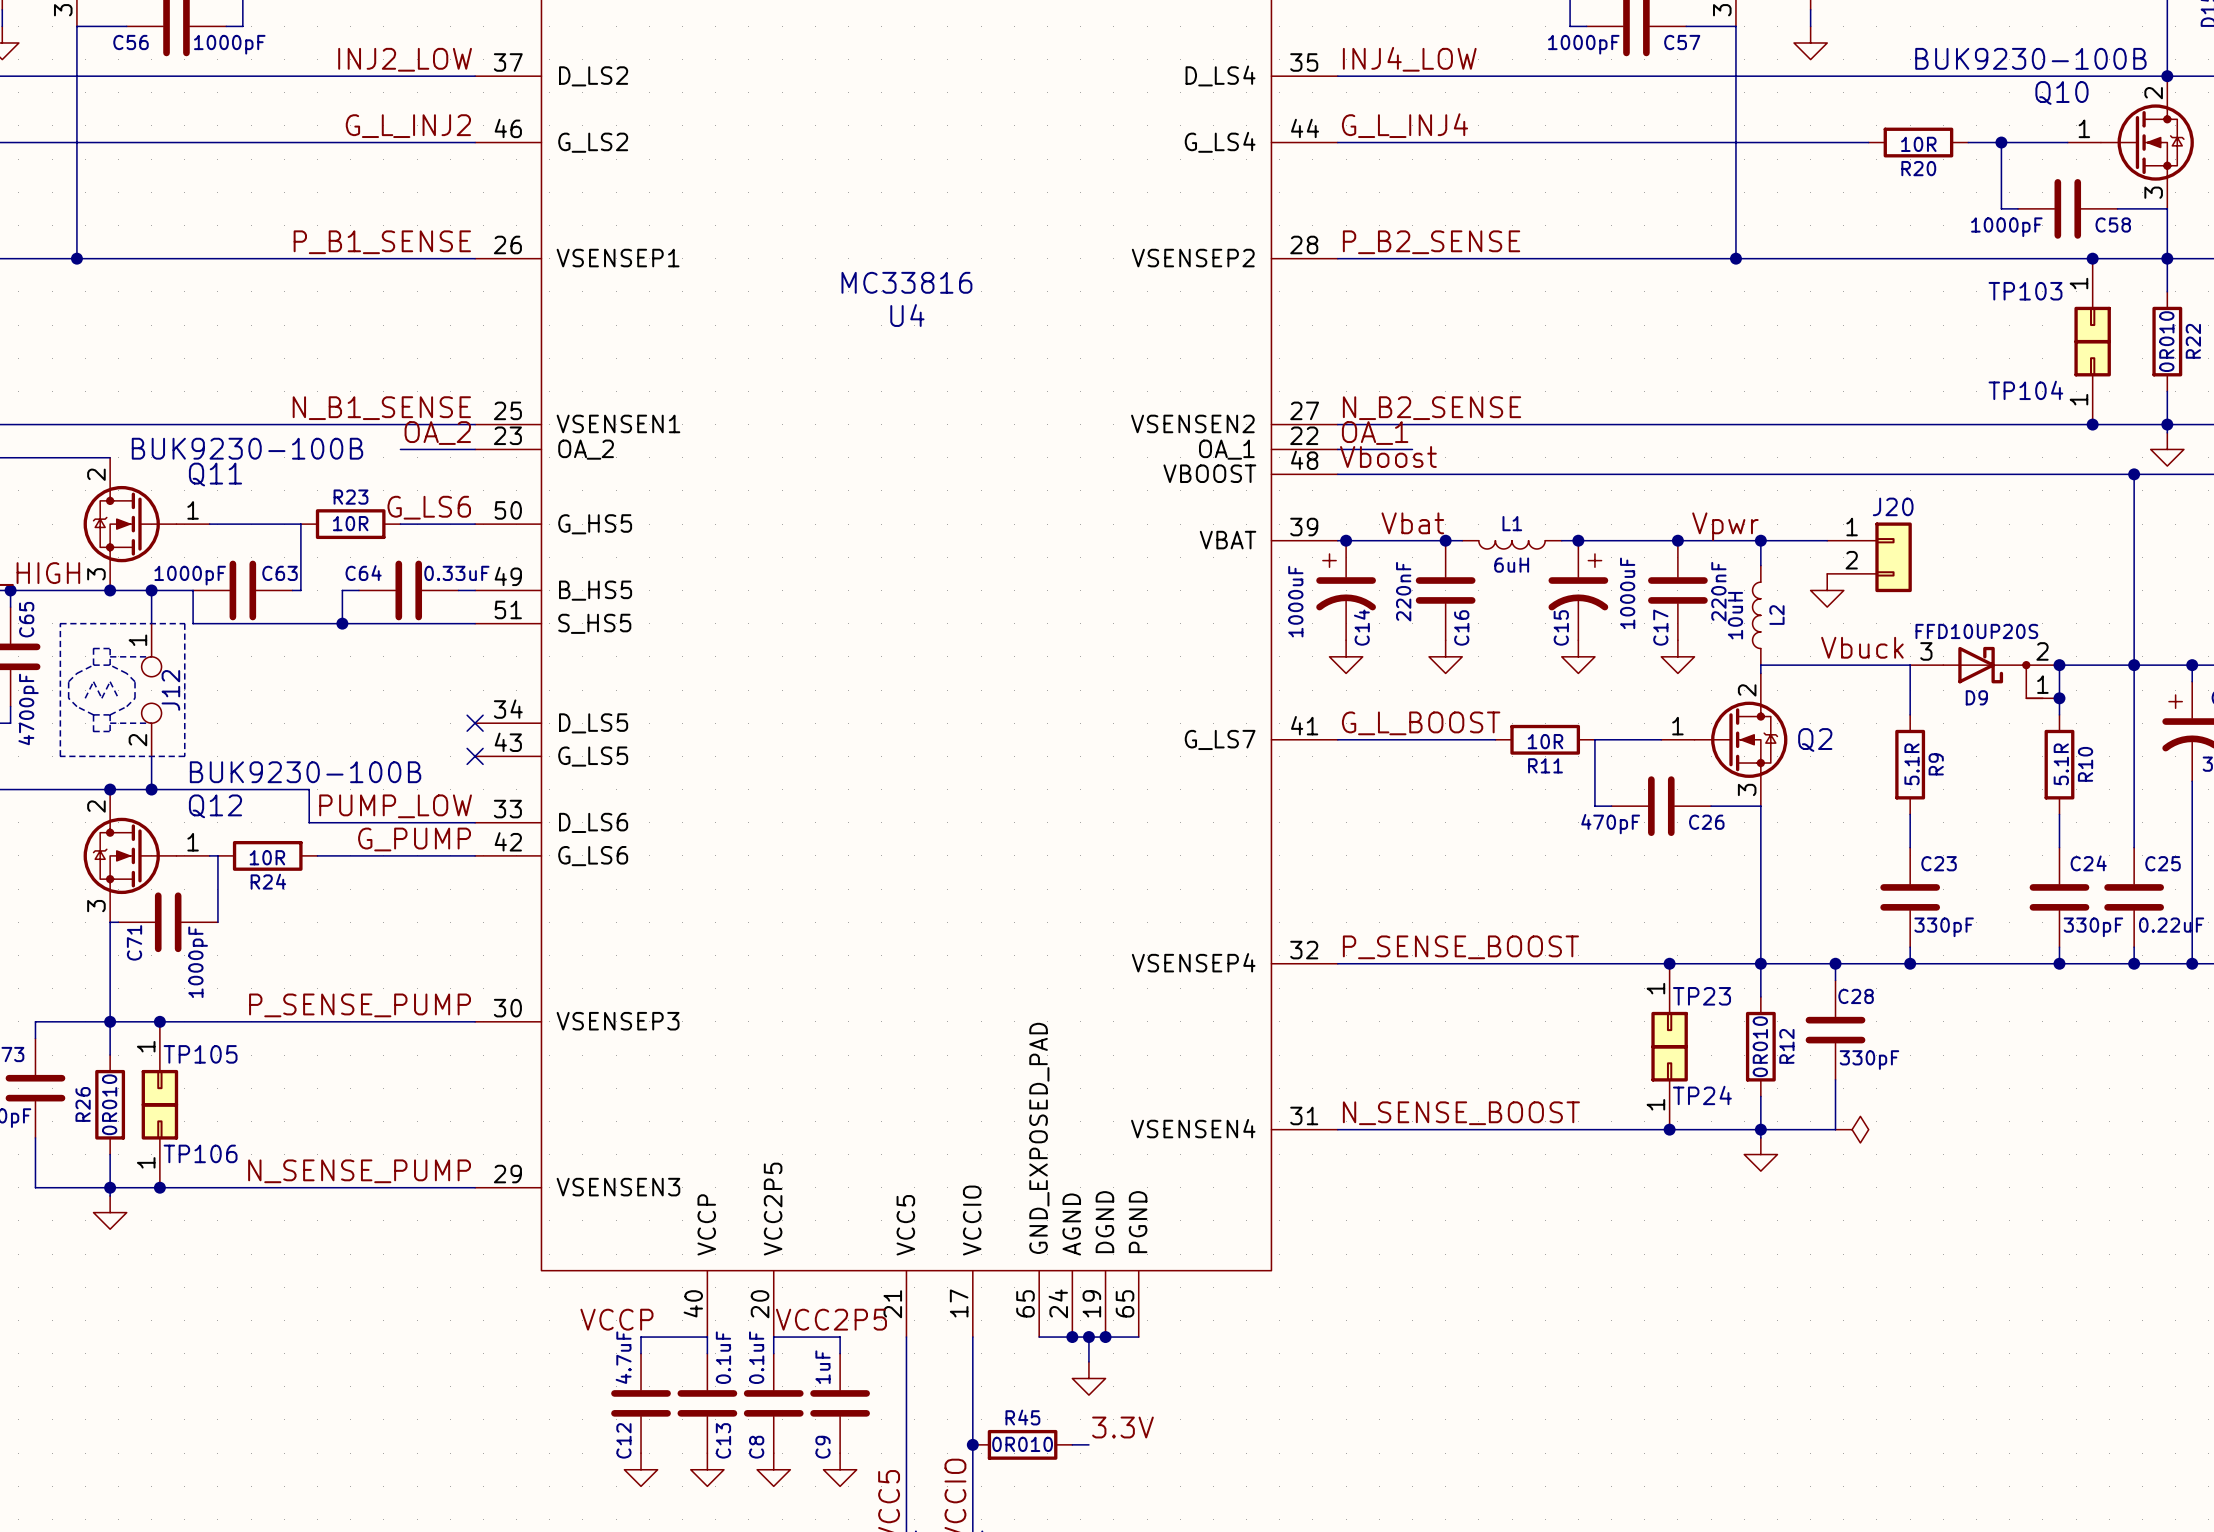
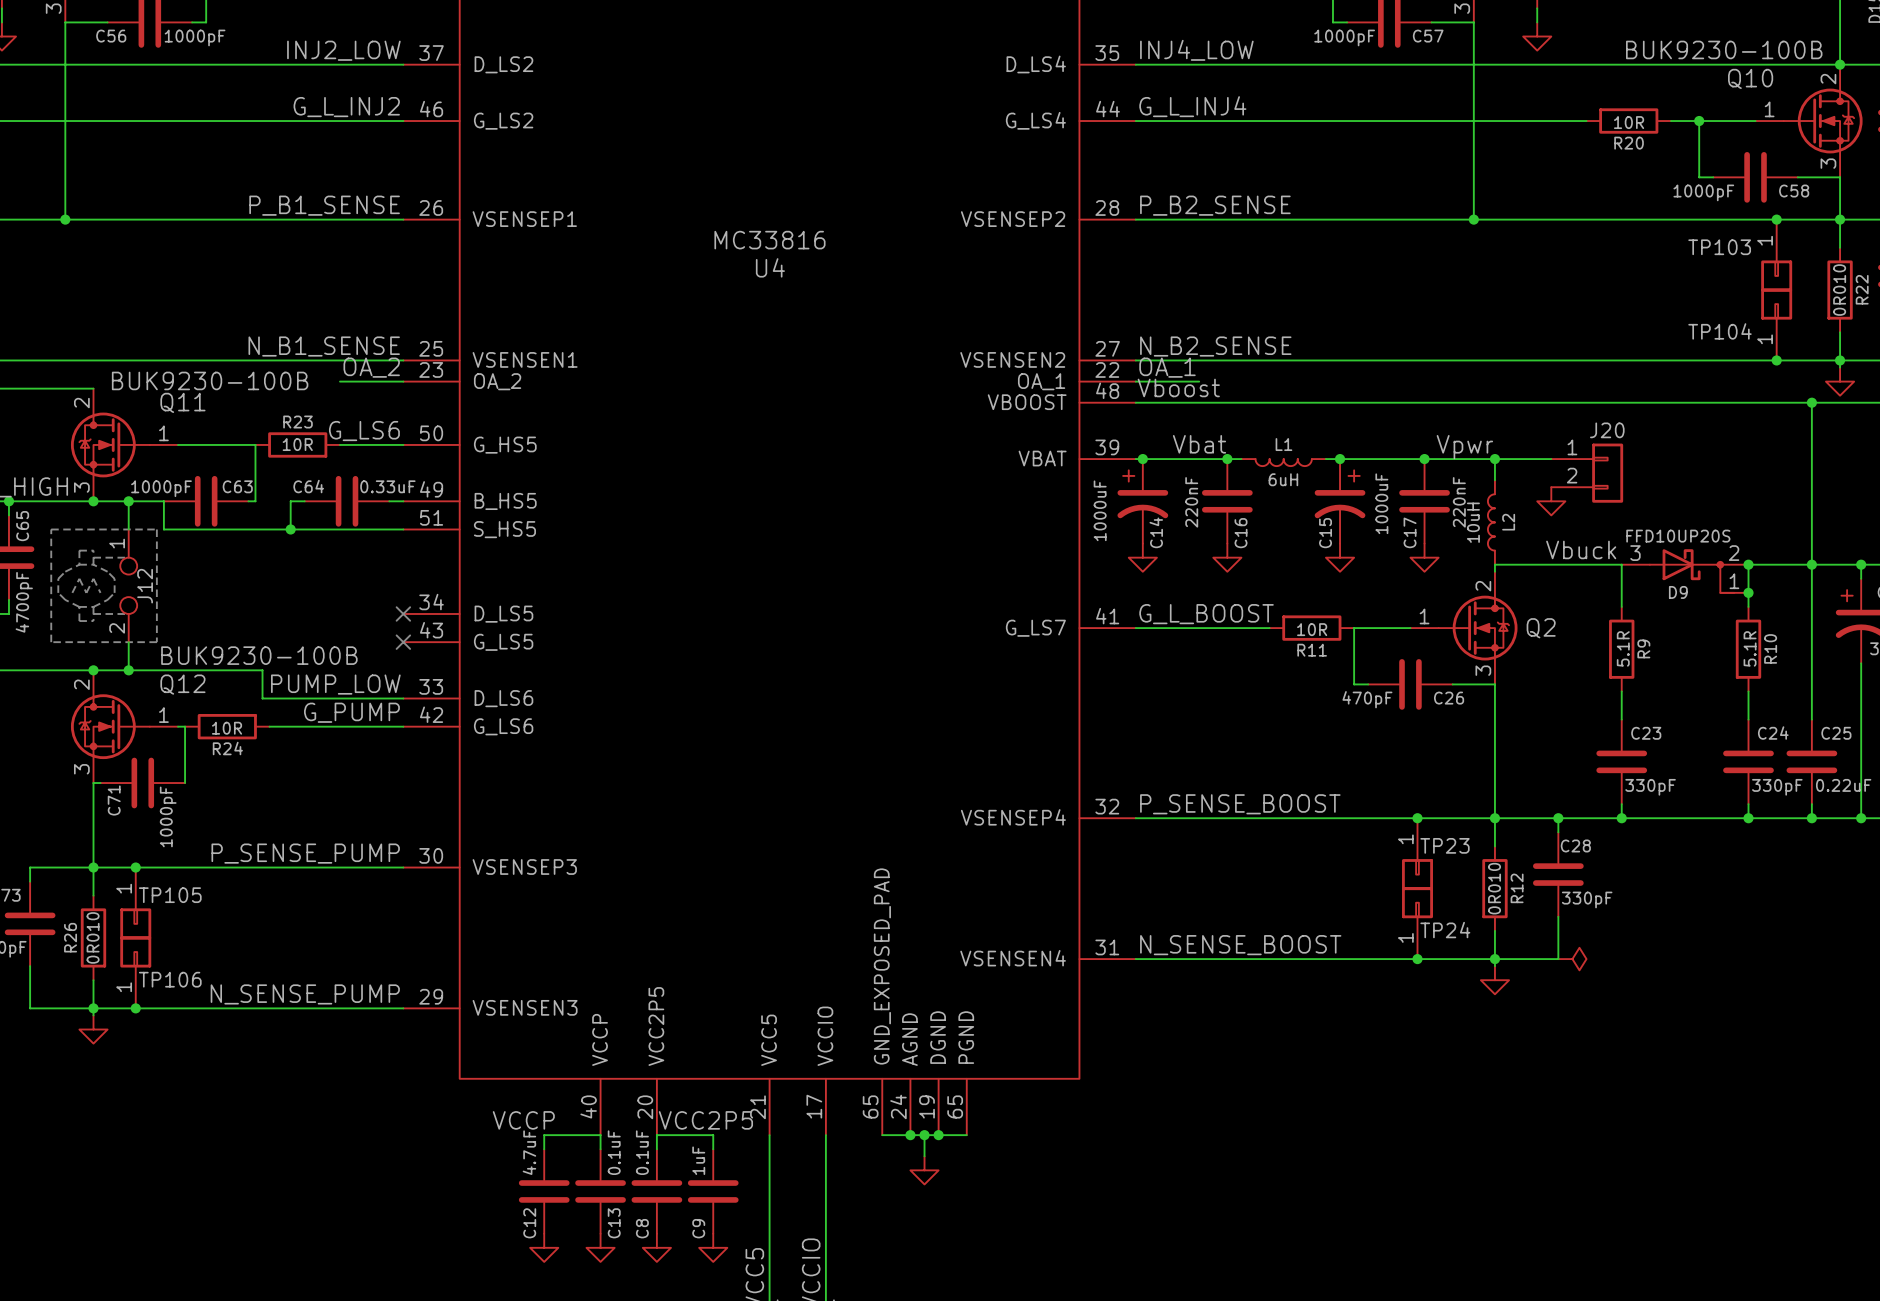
label: 3.3V (1122, 1427) -> none
junction: (972, 1444) -> none
R45: 0R010 (1022, 1444) -> none
wire: (1072, 1444) (1088, 1444) -> none

